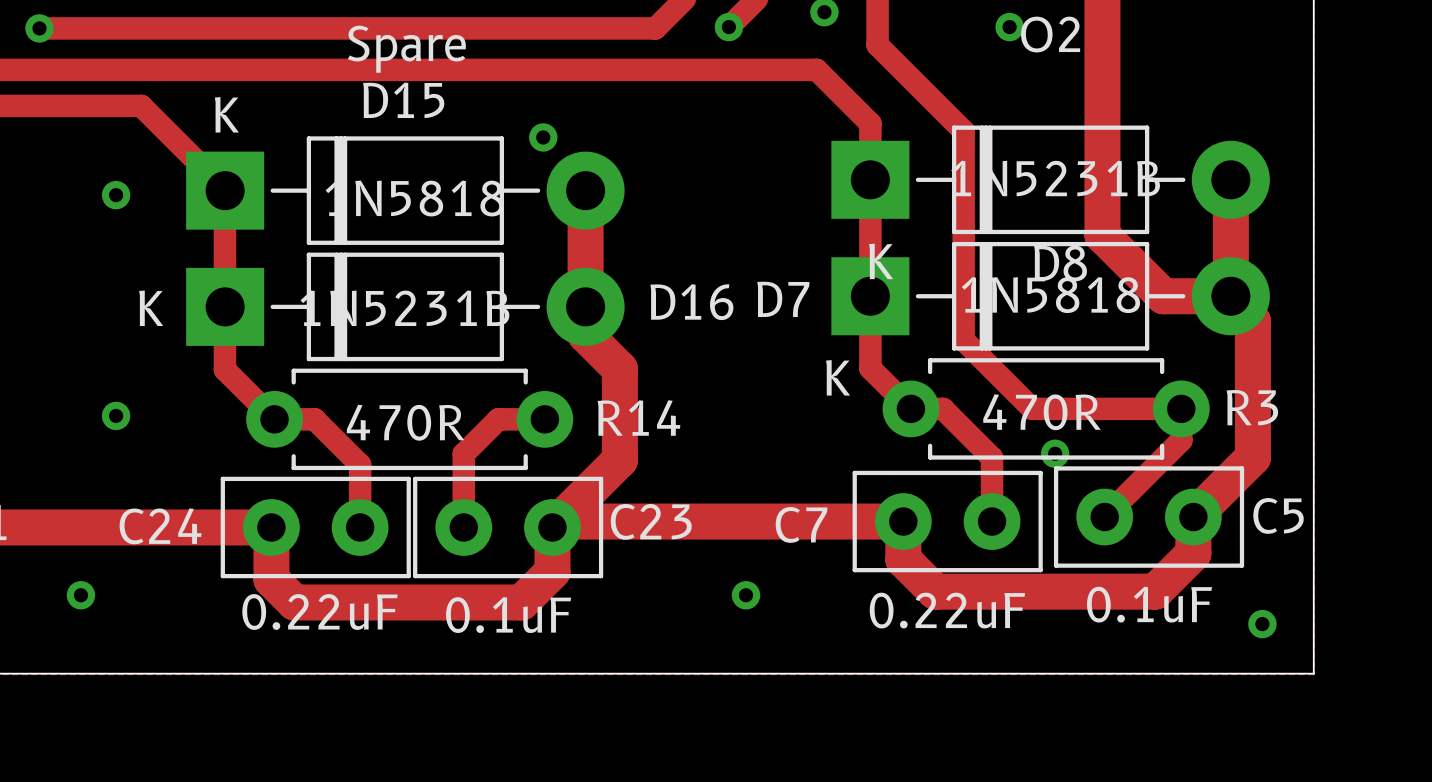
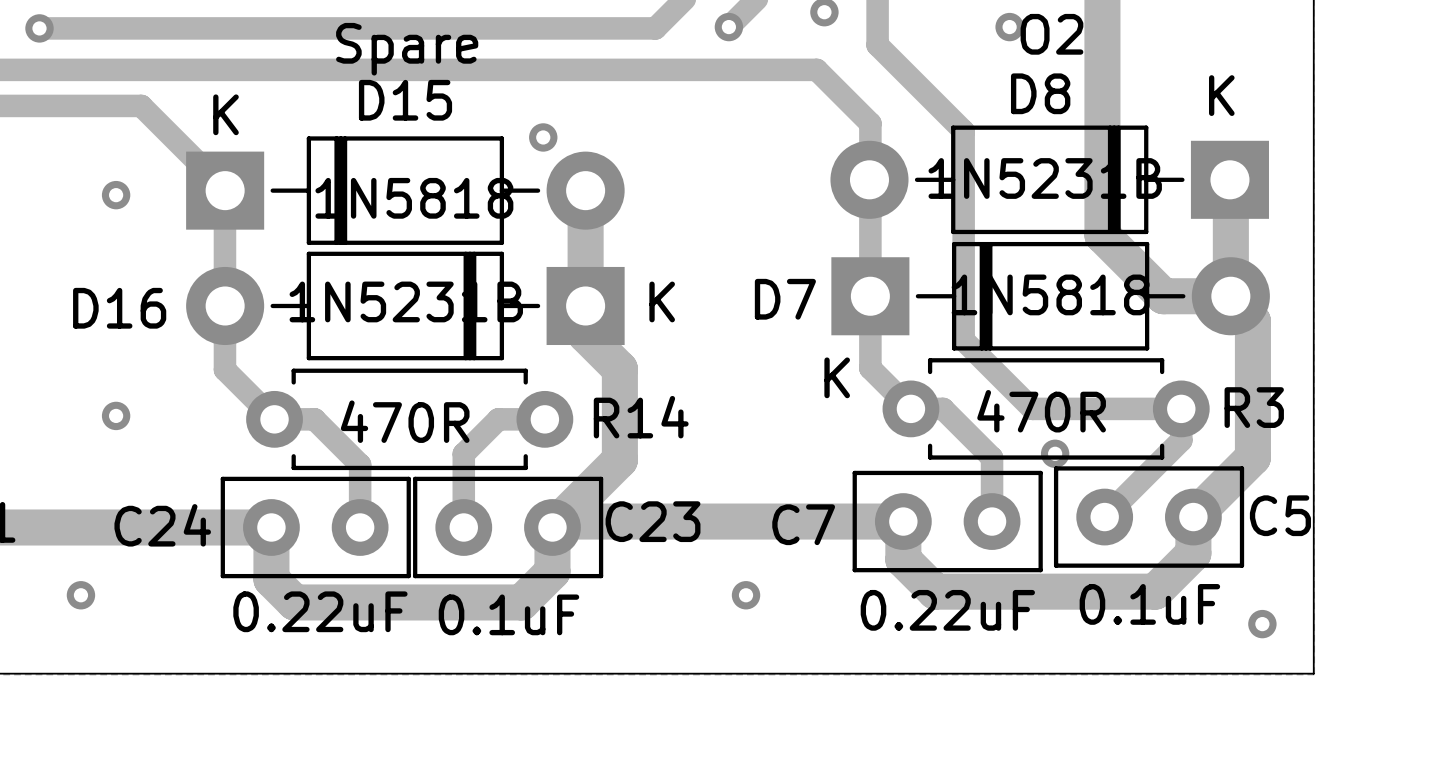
D8 rotation: 0° (1050, 179) -> 180° (1049, 179)
D16 rotation: 0° (405, 306) -> 180° (405, 305)

